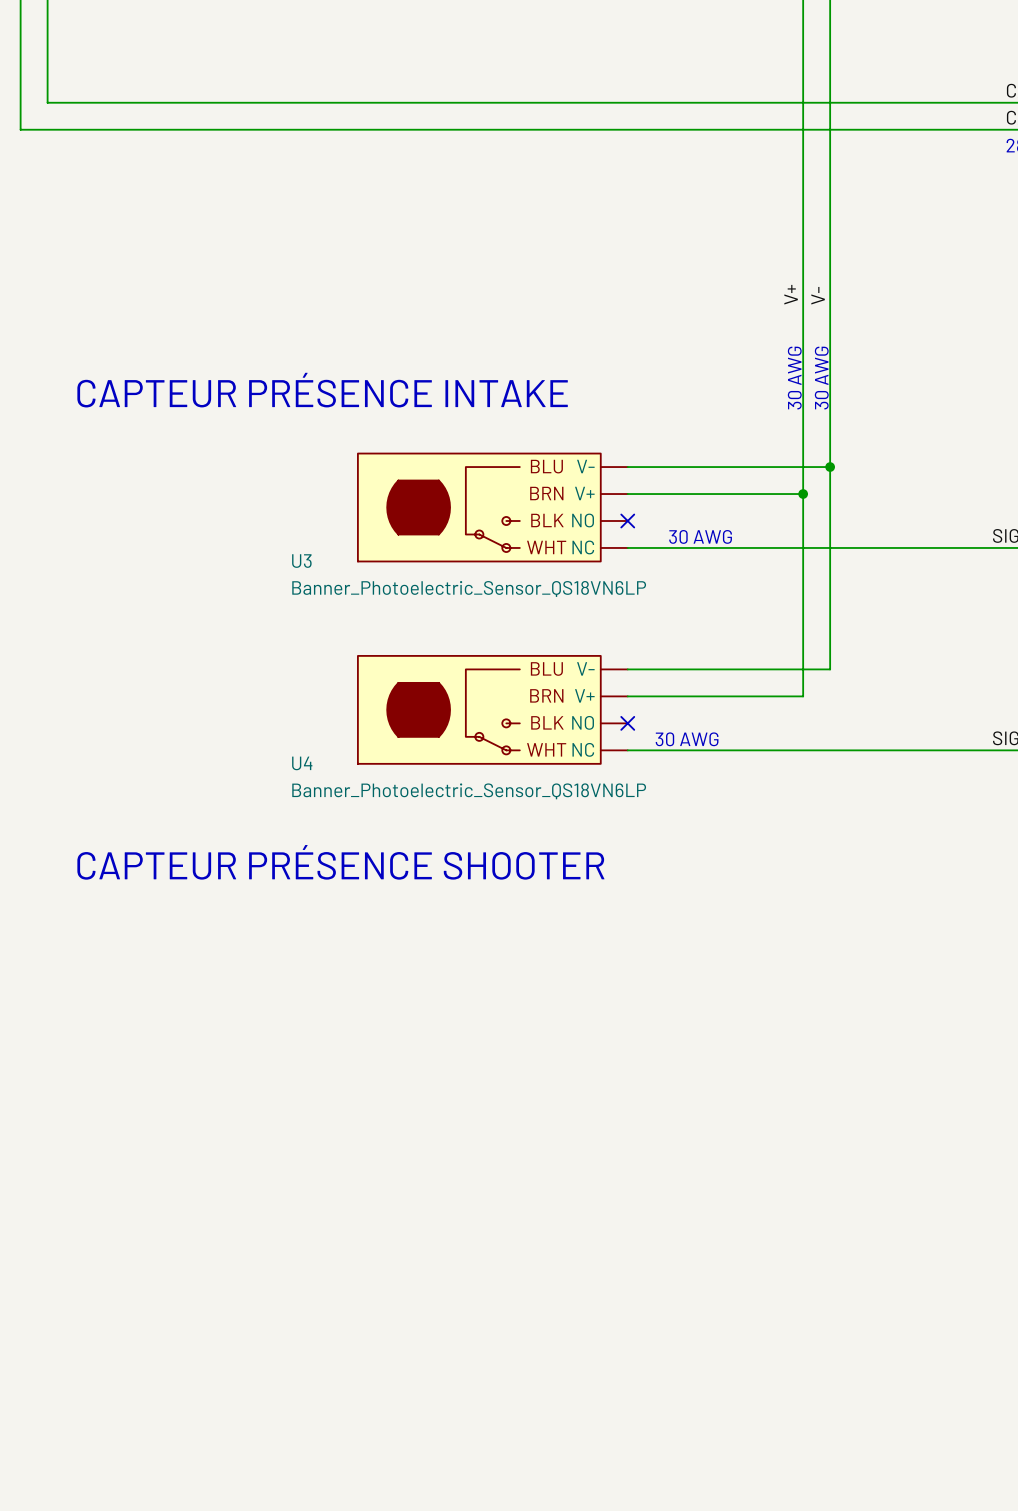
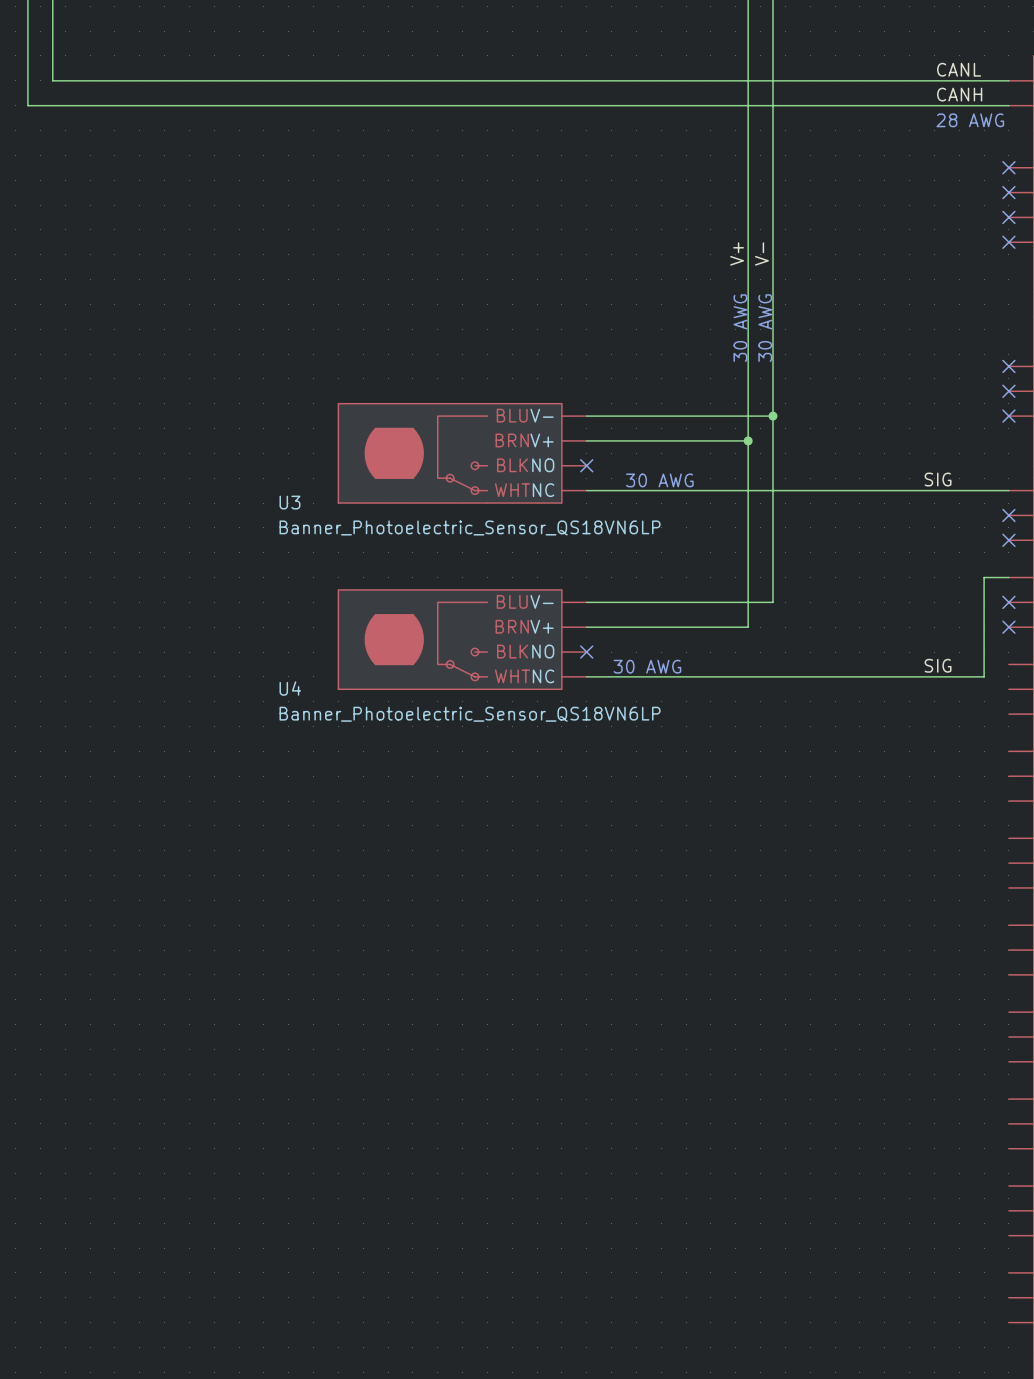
text: CAPTEUR PRÉSENCE INTAKE (322, 390) -> none
text: CAPTEUR PRÉSENCE SHOOTER (340, 862) -> none

